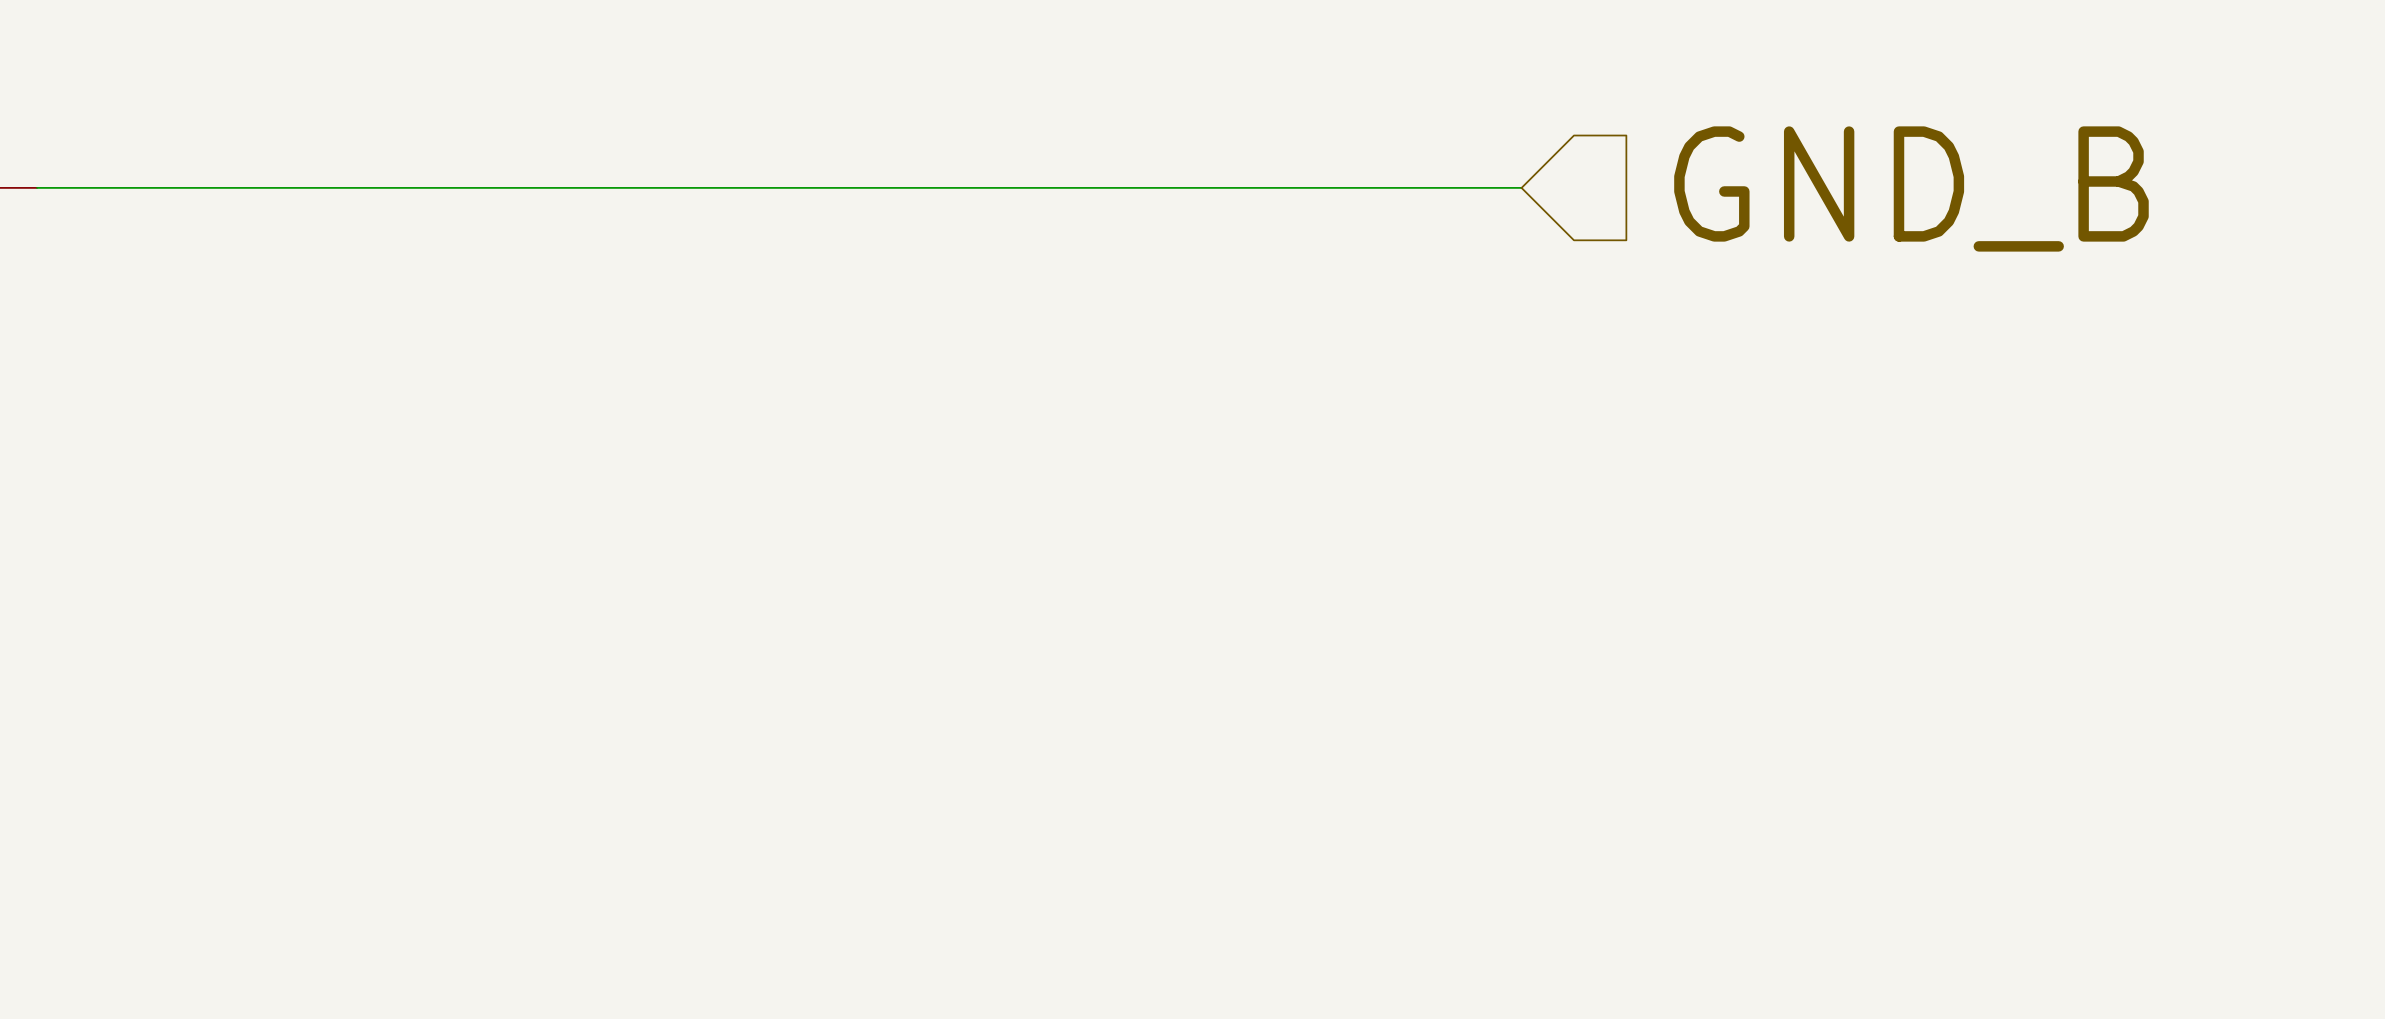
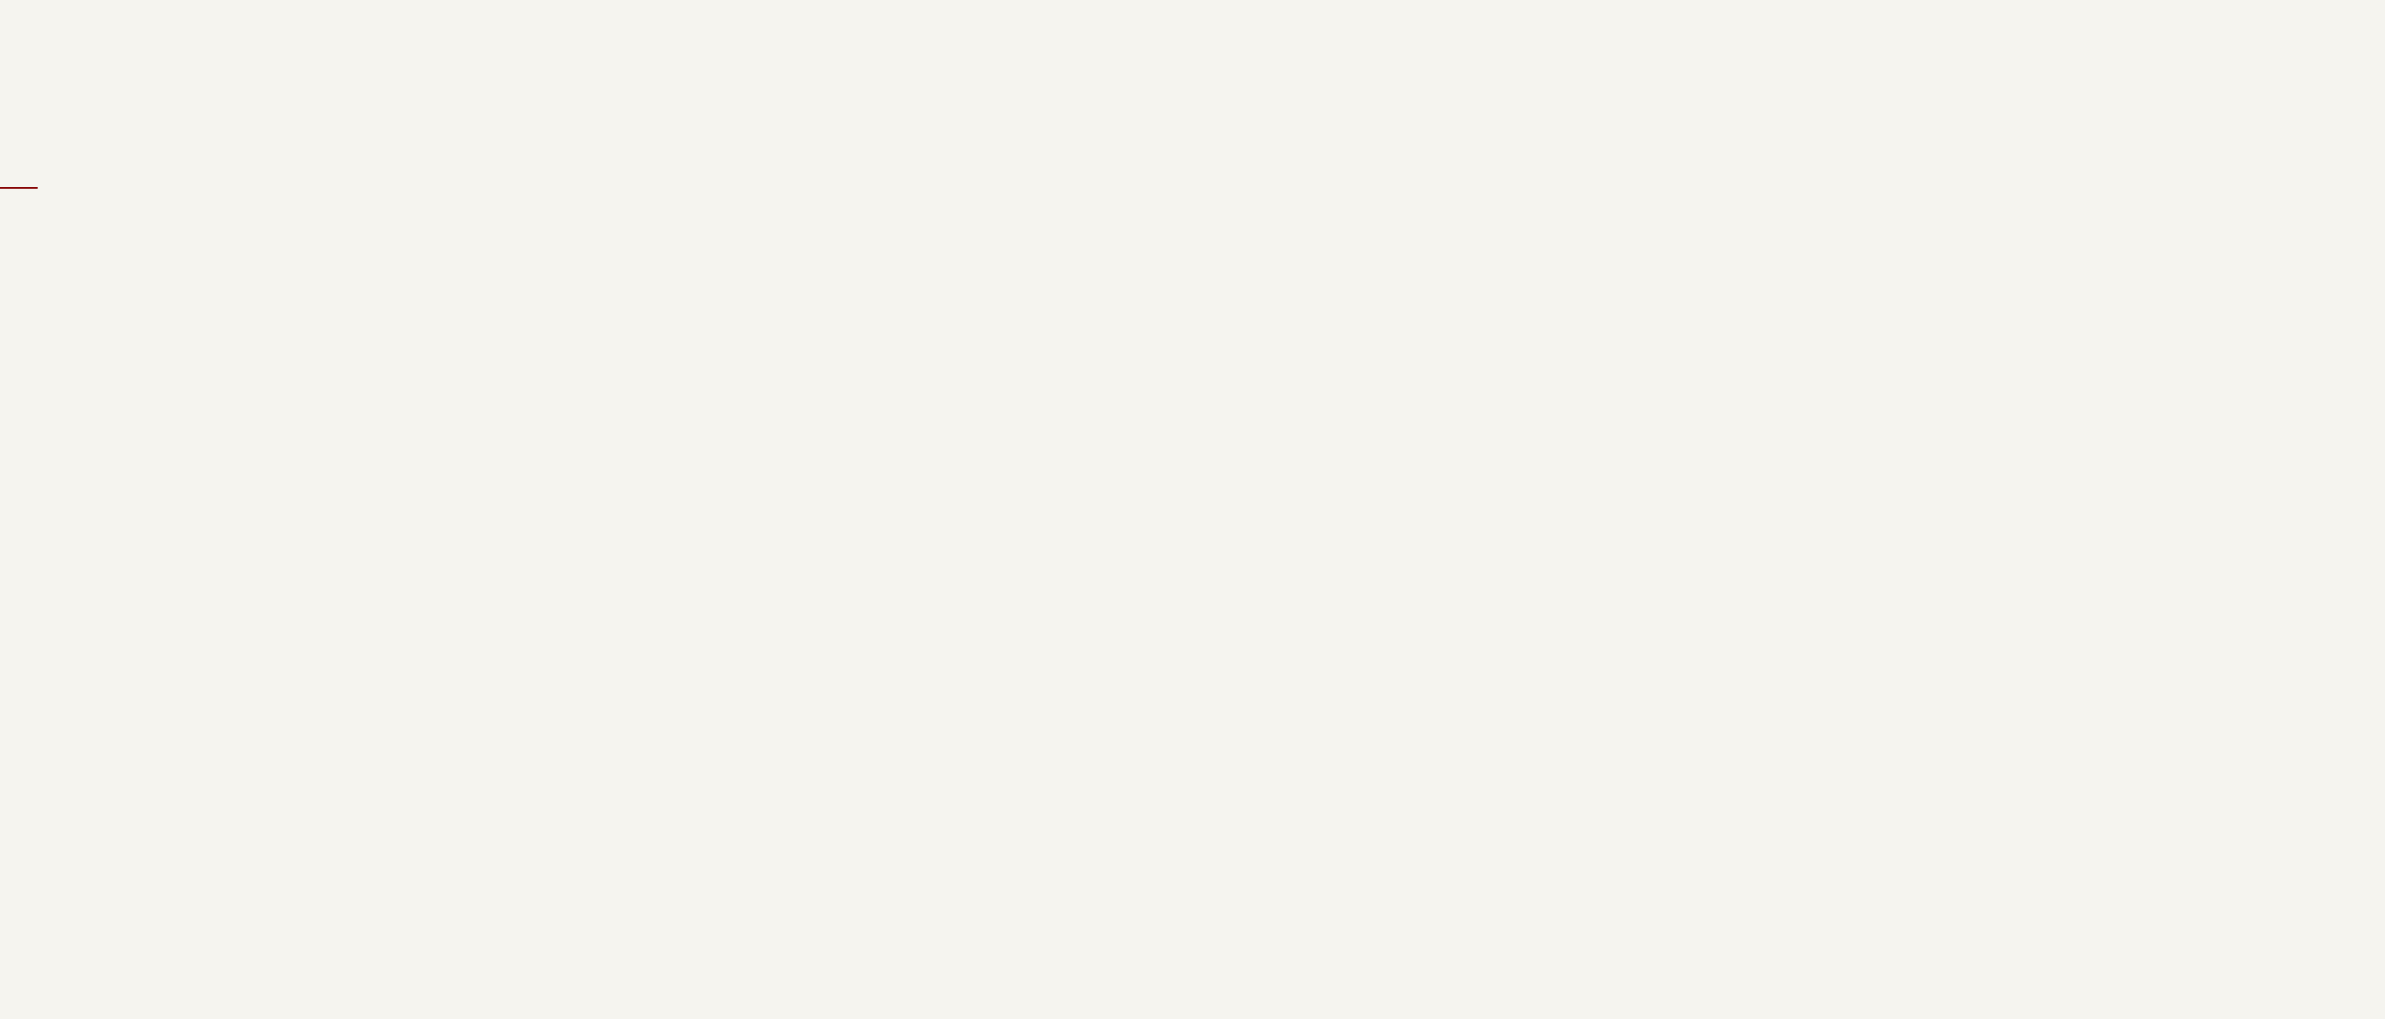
wire: (37, 187) (1521, 187) -> none
hierarchical label: GND_B (1911, 188) -> none

